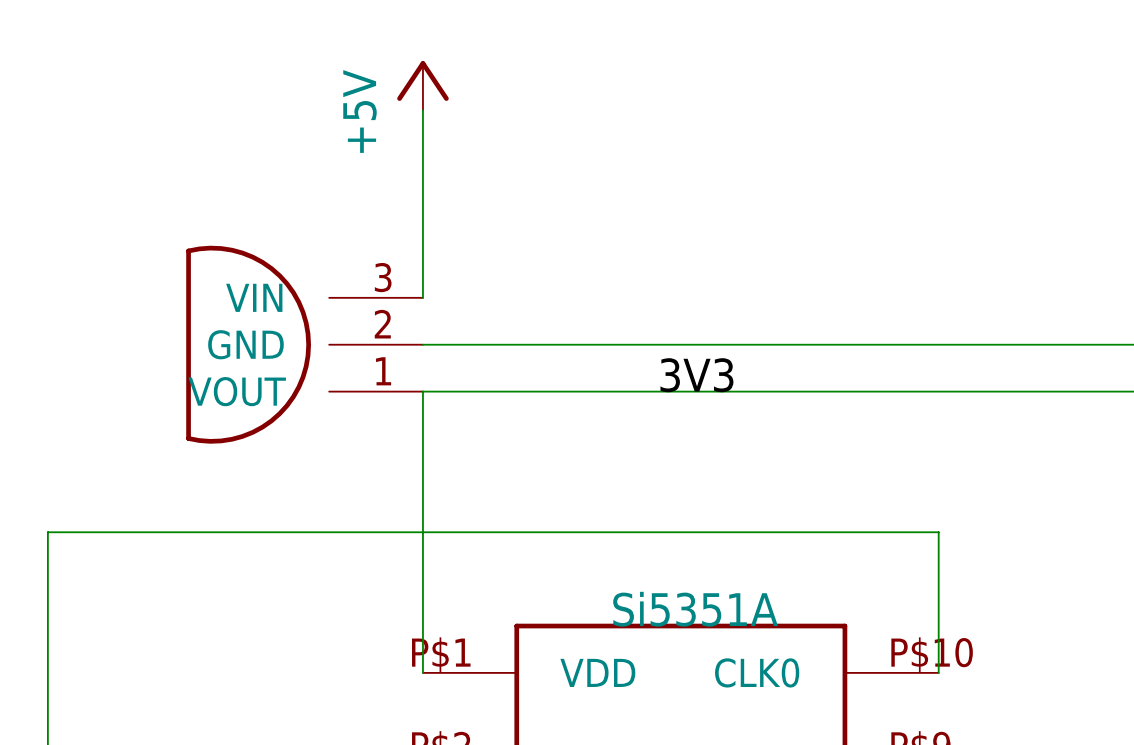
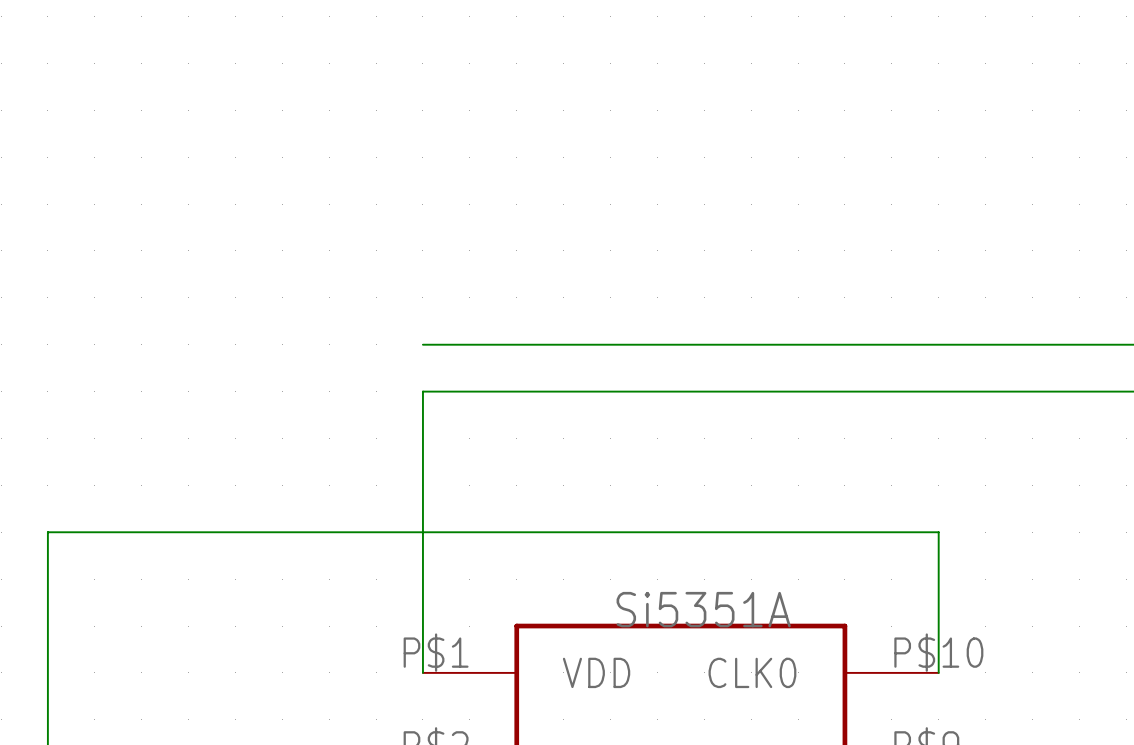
power symbol: +5V (422, 85) -> none
wire: (422, 110) (422, 297) -> none
part: (304, 344) -> none
label: 3V3 (696, 375) -> none

